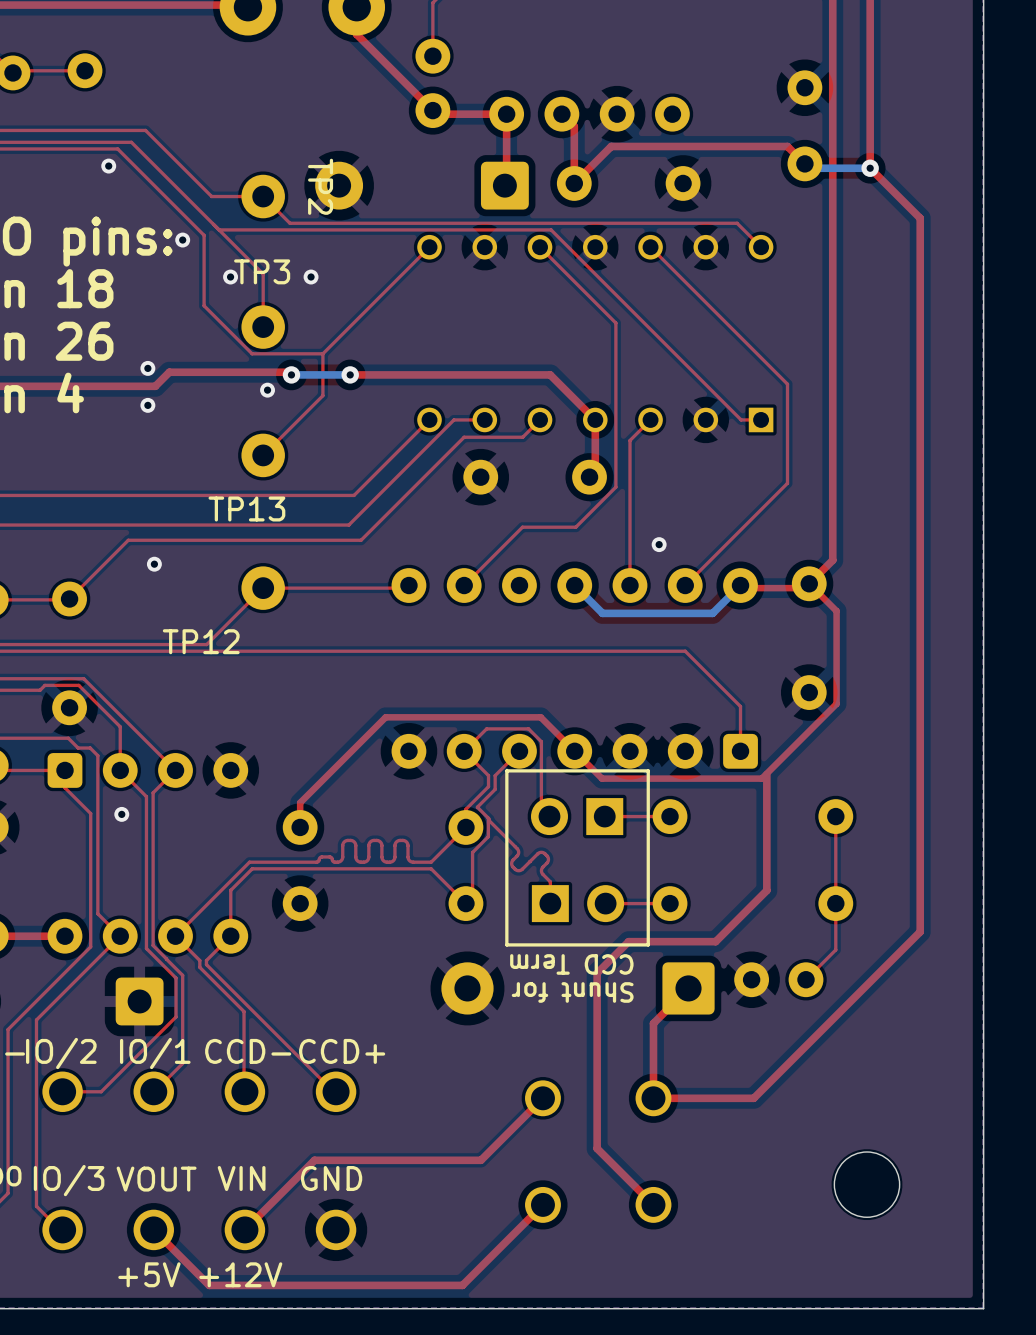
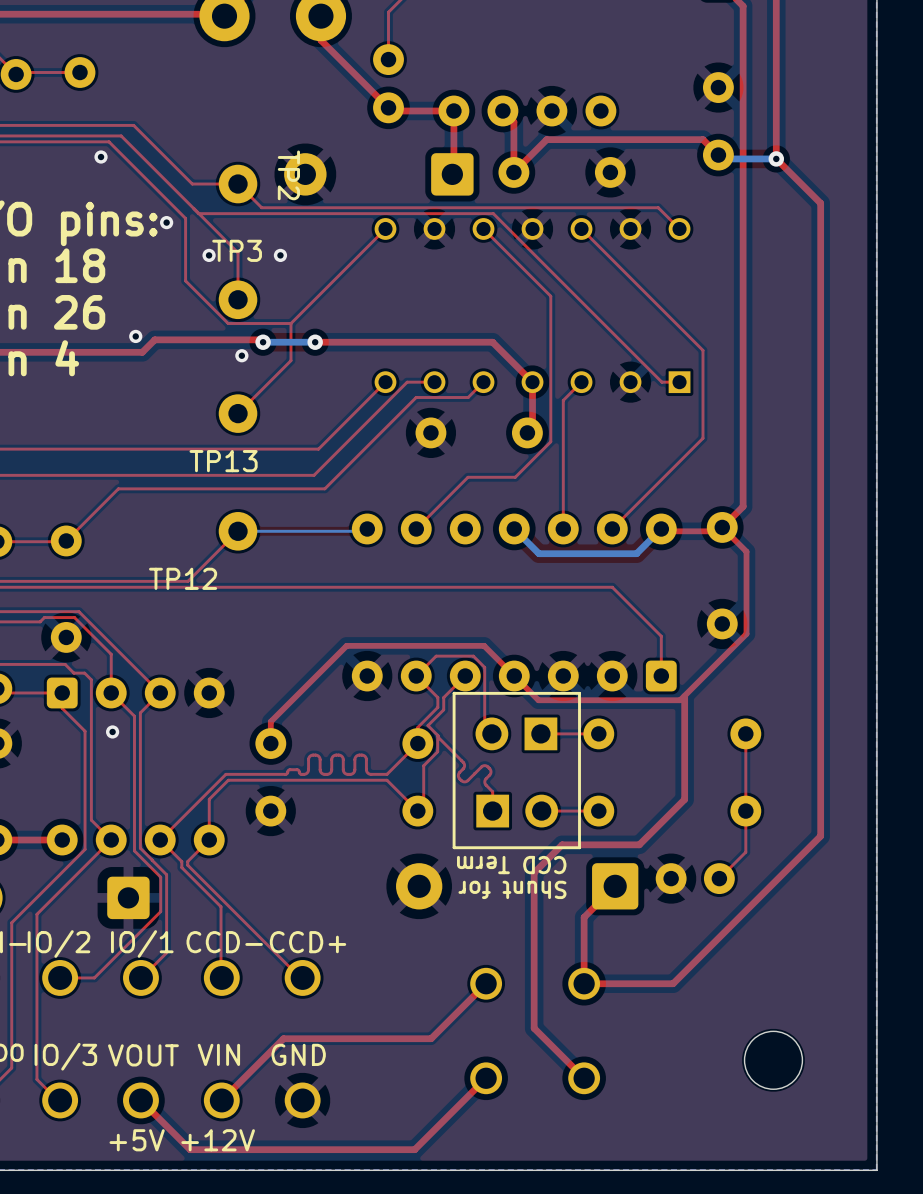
via: (147, 405) -> none
via: (659, 544) -> none
via: (154, 564) -> none
top track: (408, 585) (406, 588) (263, 588) -> none
bottom track: none -> (364, 531) (238, 531)

